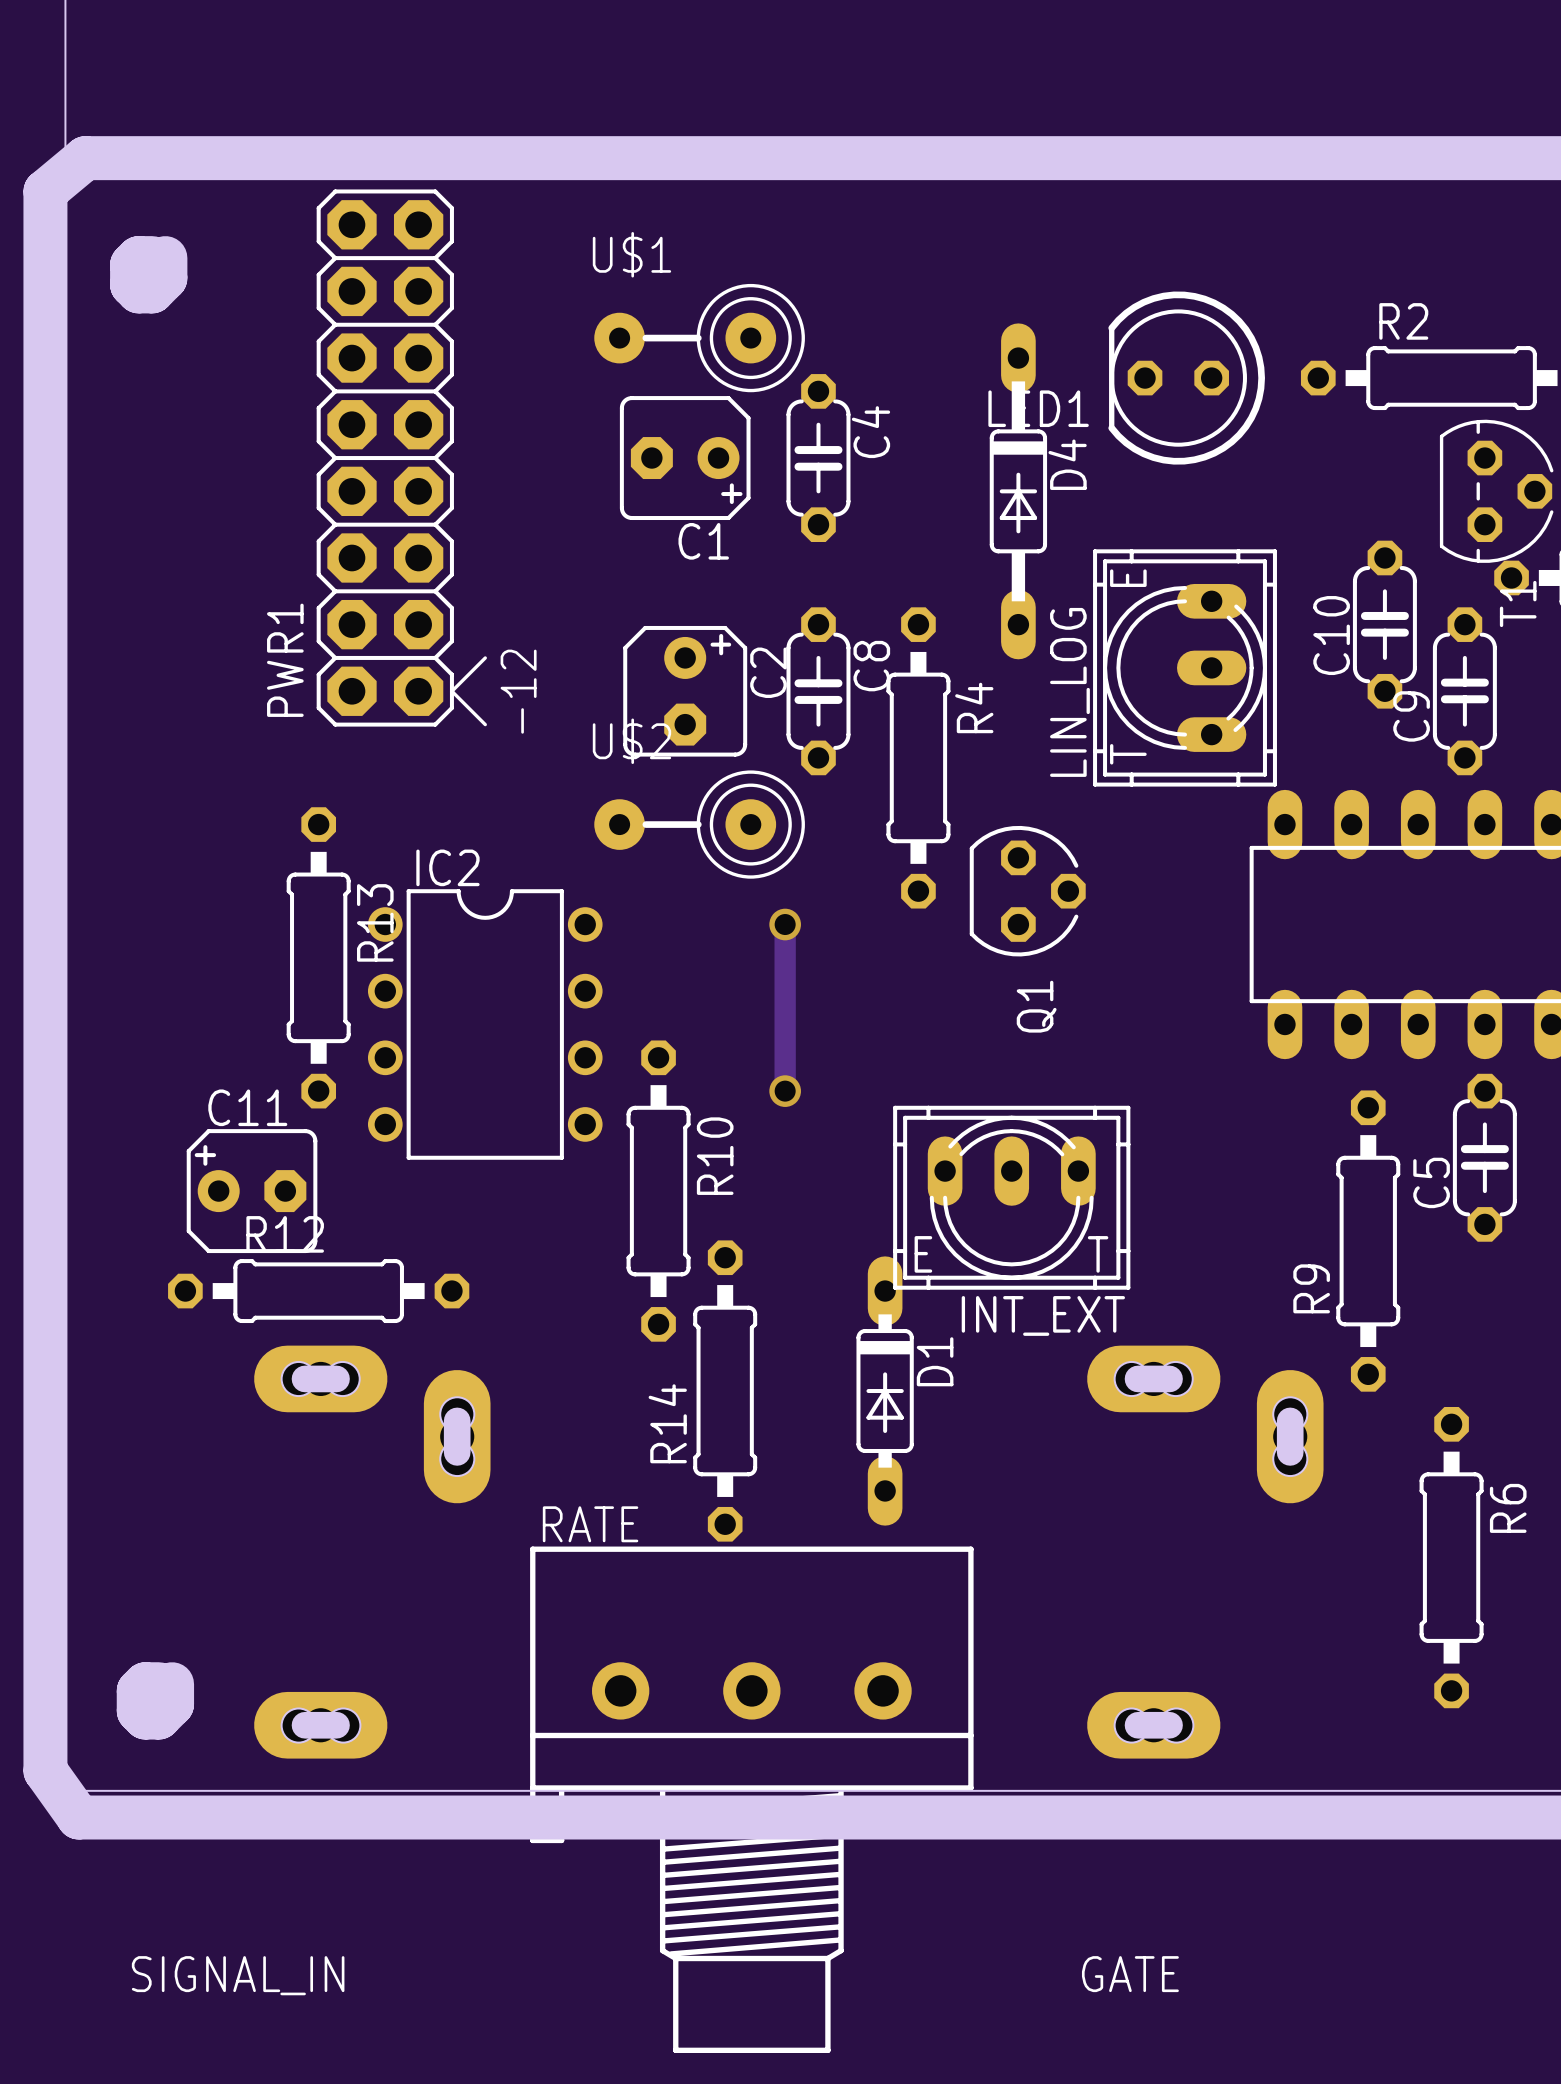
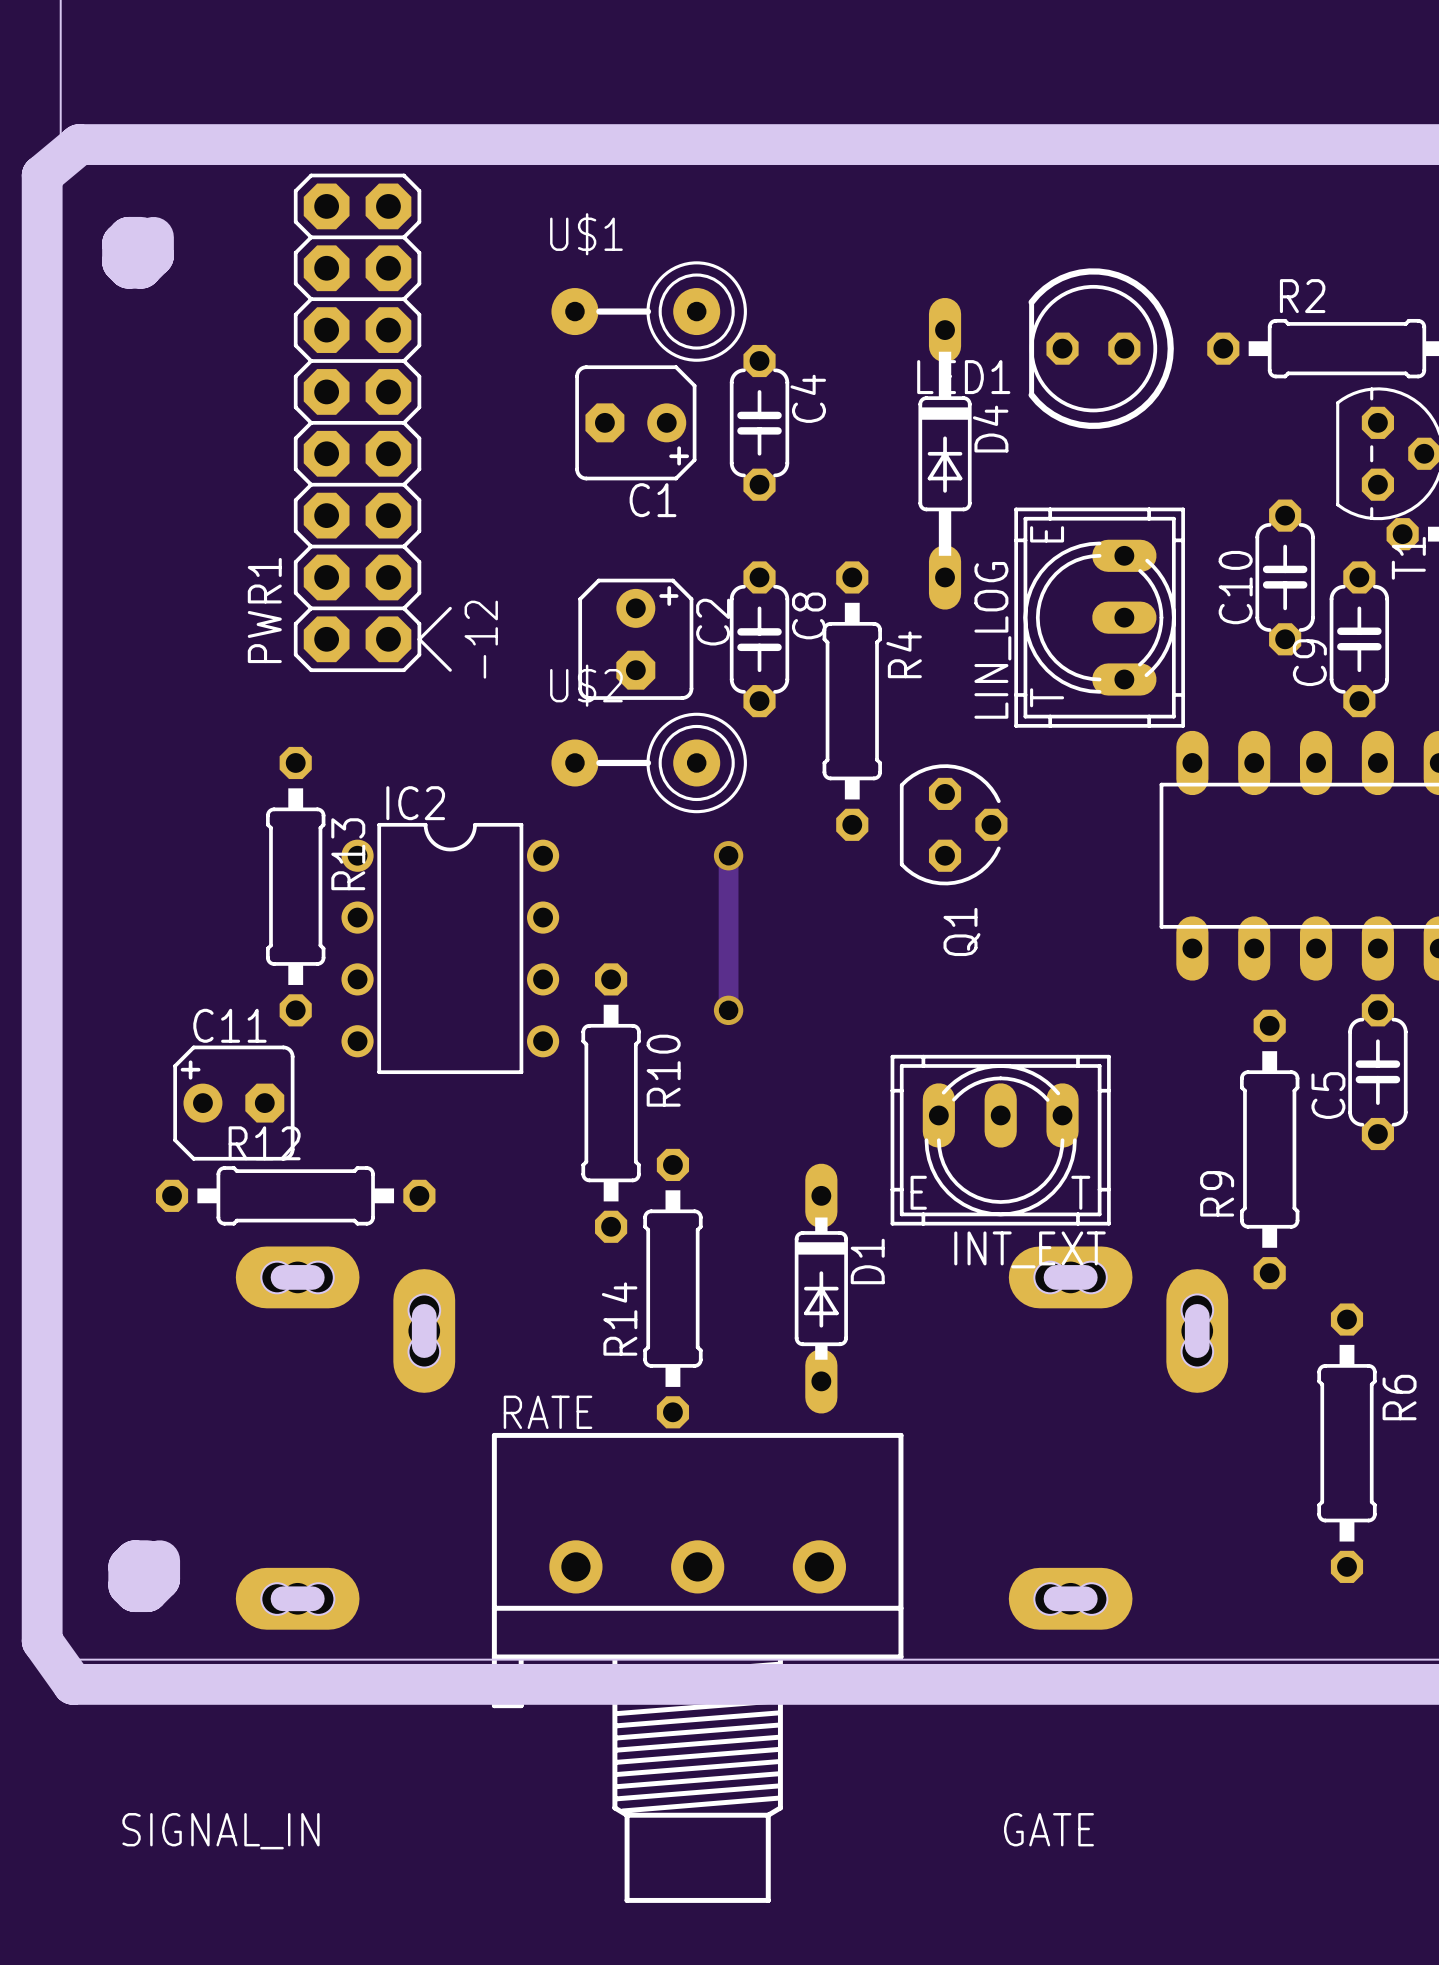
INT_EXT position: (1011, 1197) -> (1000, 1140)

